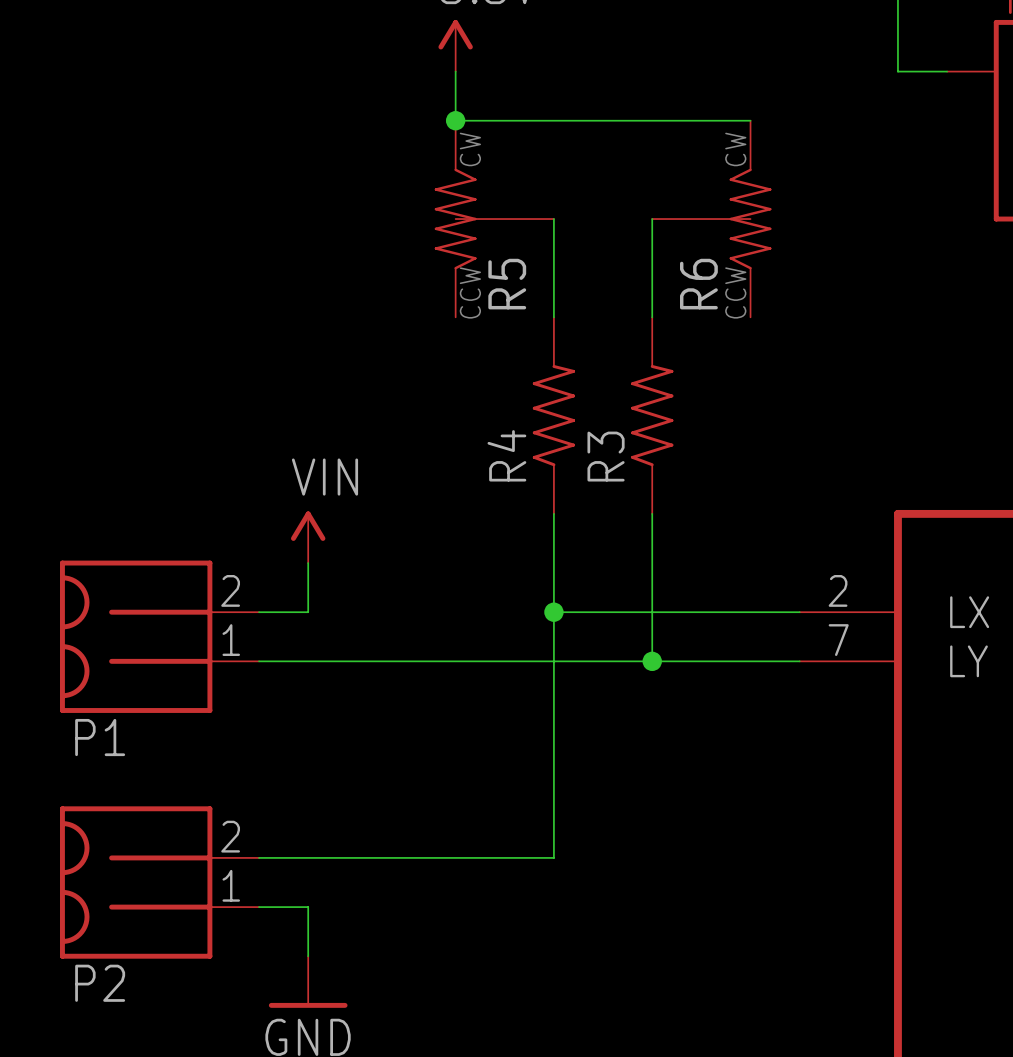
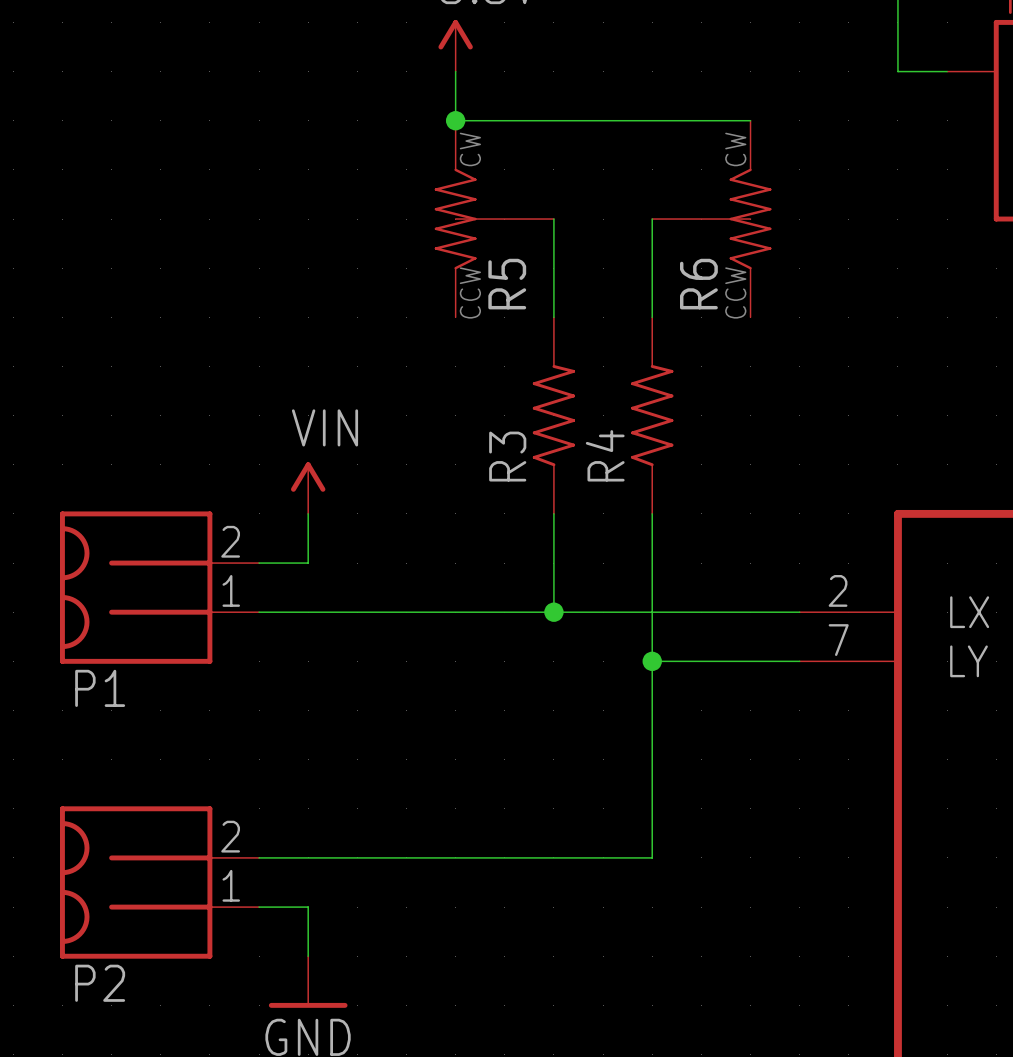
R4 name: R4 (506, 455) -> R3 (507, 456)
R3 name: R3 (606, 456) -> R4 (605, 455)
wire: none -> (308, 513) (308, 563) (259, 563)
power symbol position: VIN (308, 537) -> VIN (308, 488)
wire: (308, 563) (308, 612) -> (553, 612) (308, 612)
wire: (553, 612) (553, 857) -> (652, 661) (652, 857) (553, 857)
P1 position: (159, 636) -> (159, 587)
wire: (259, 661) (652, 661) -> none

